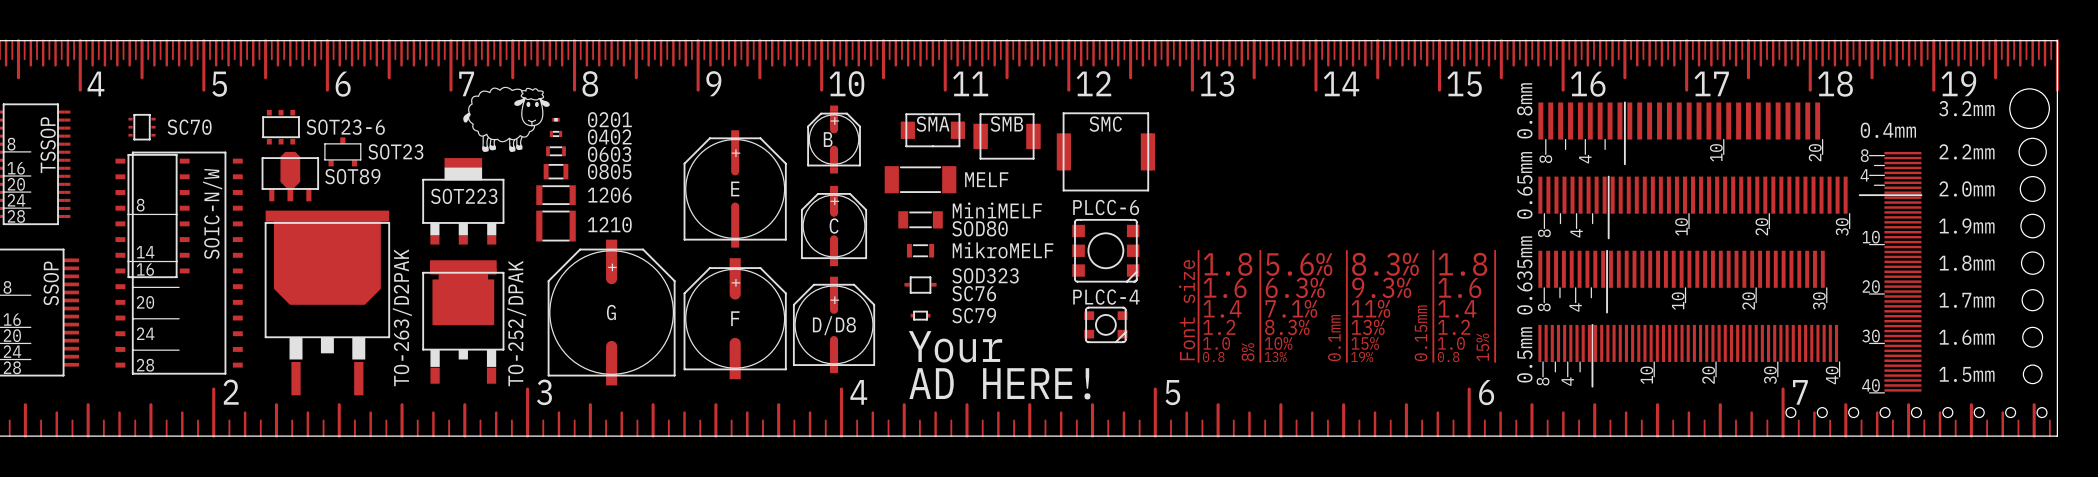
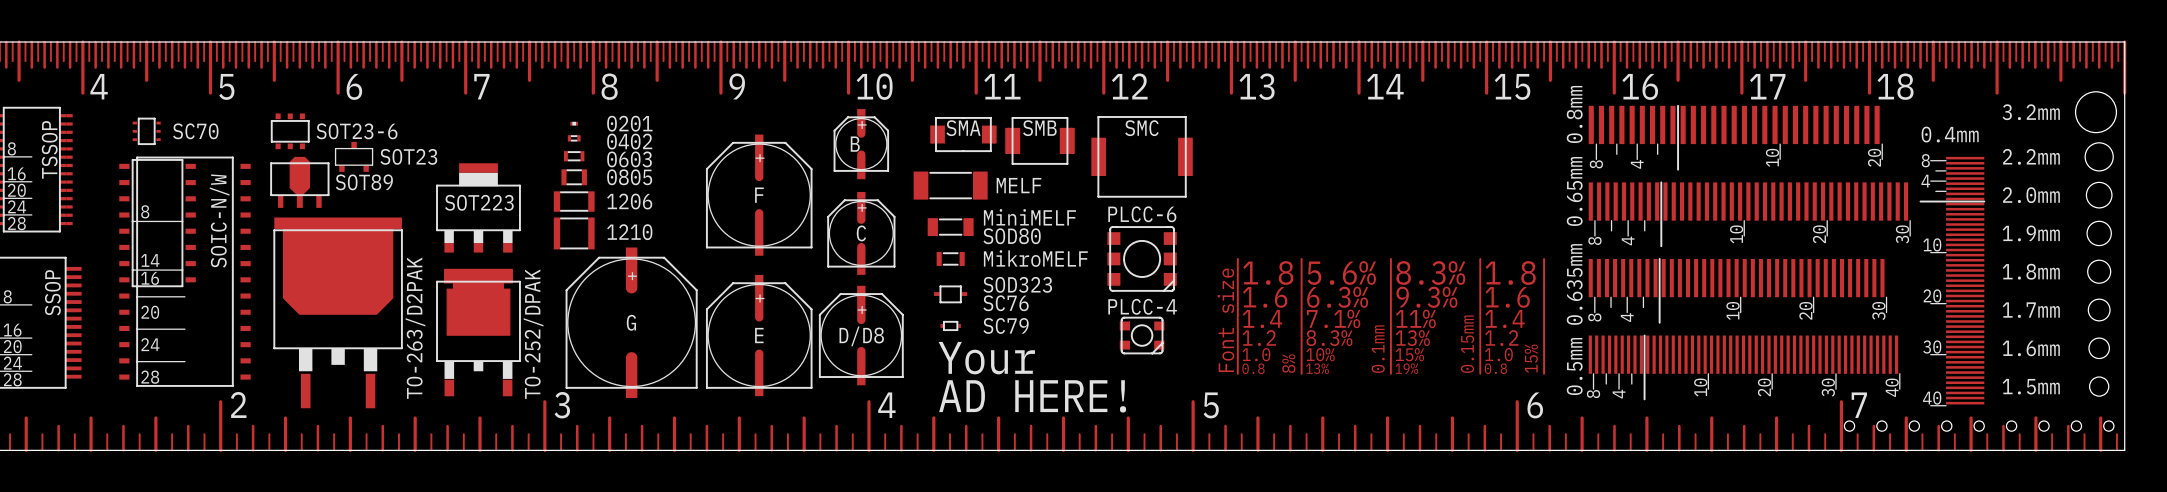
text: 19 (1958, 83) -> none
drawing: [463, 86, 550, 152] -> none
text: E (735, 188) -> F (759, 195)
part footprint: [683, 258, 787, 380] -> [705, 274, 813, 397]
text: F (735, 318) -> E (759, 335)

